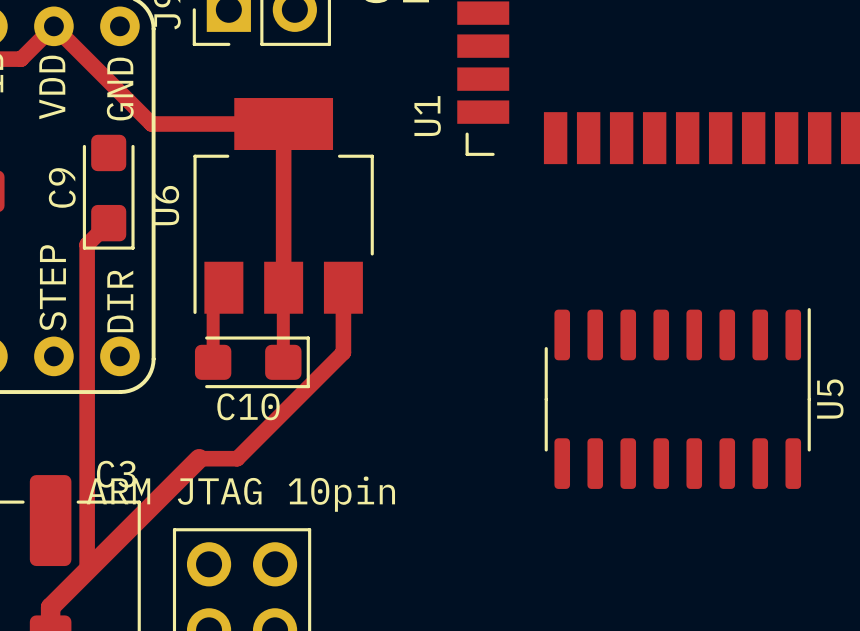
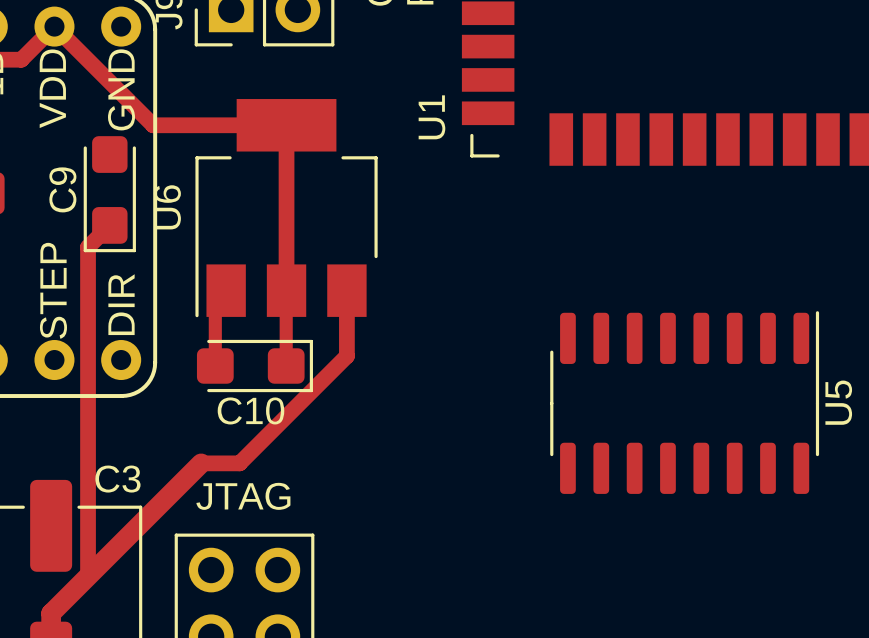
part value: ARM JTAG 10pin (240, 494) -> JTAG (243, 496)

